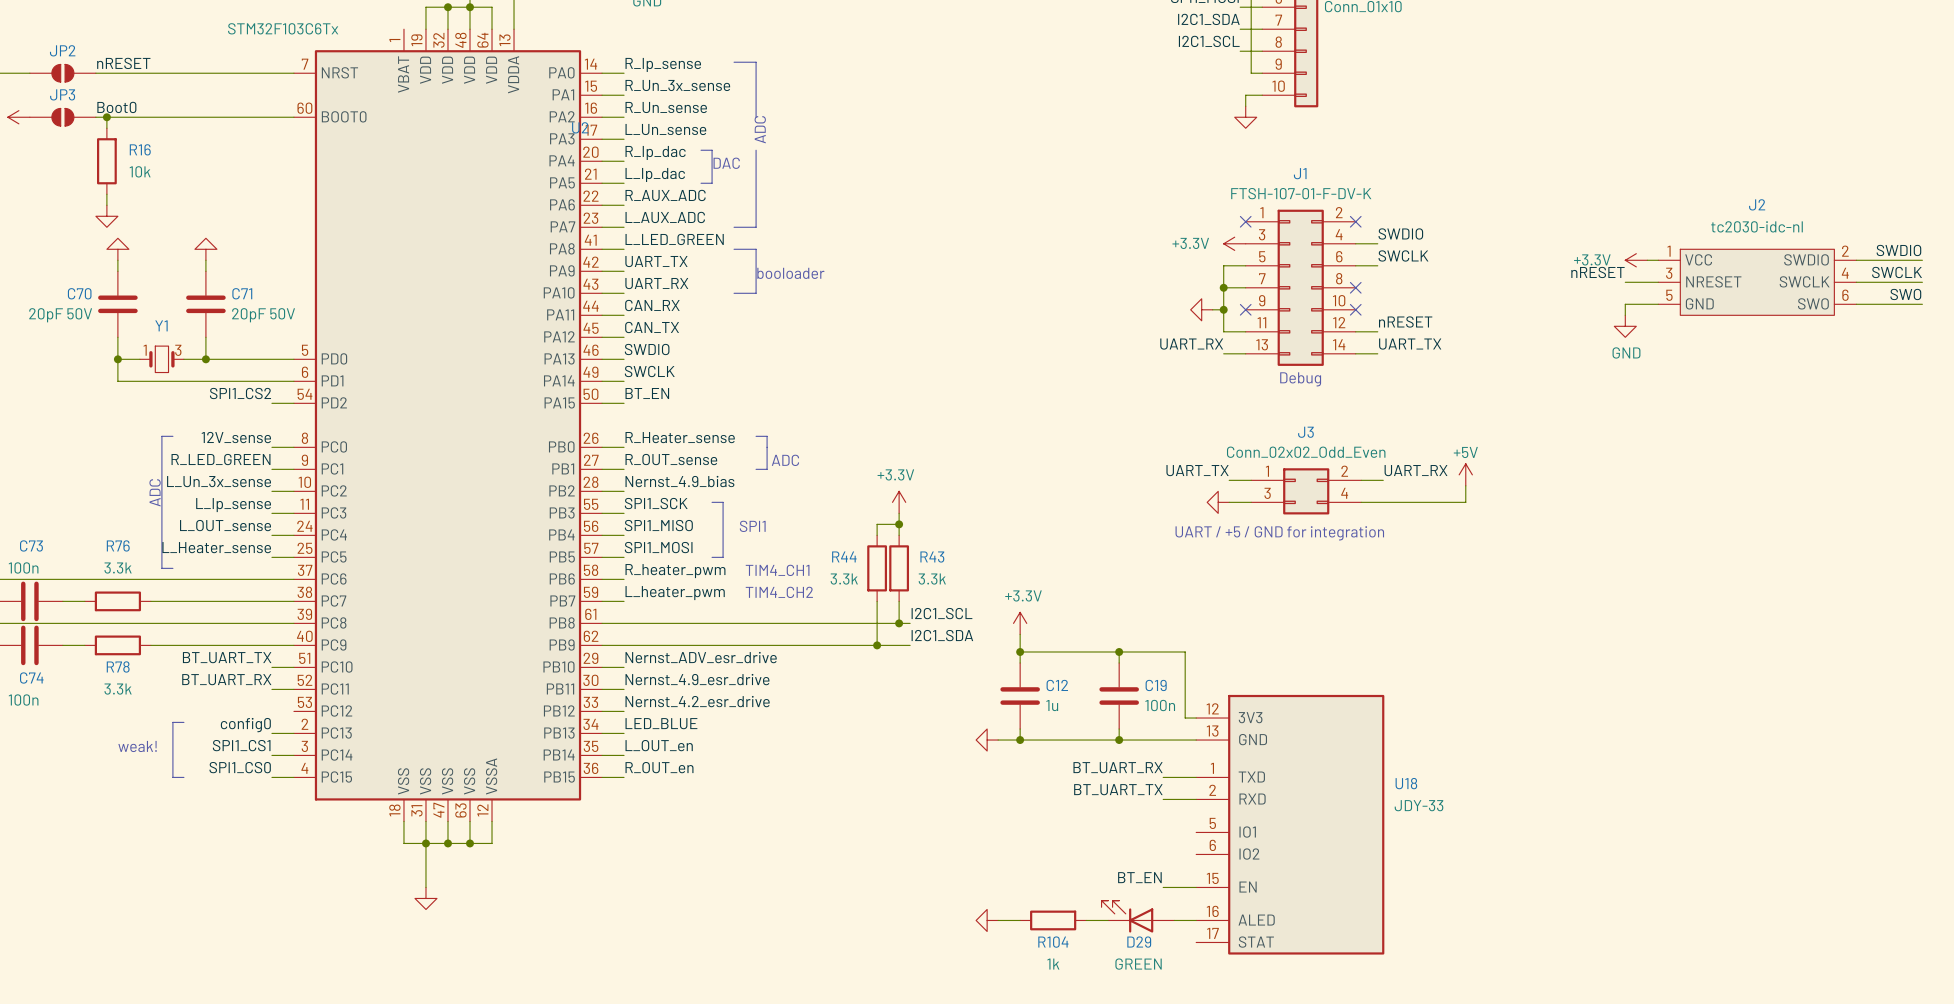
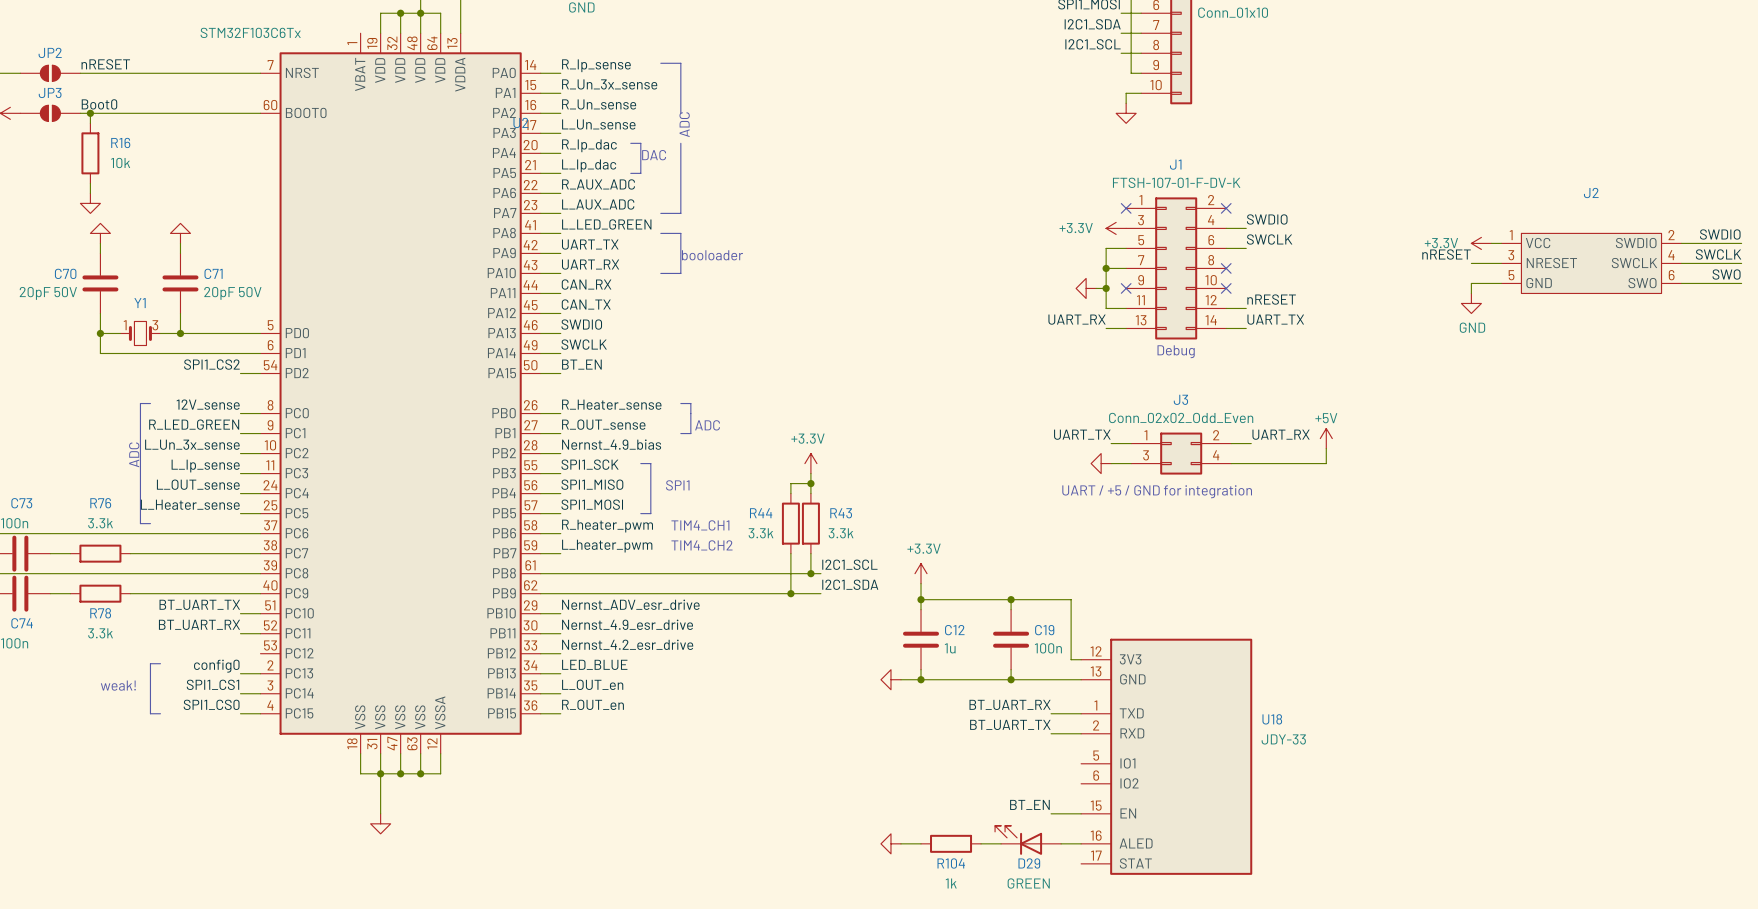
J2 value: tc2030-idc-nl (1757, 226) -> none

